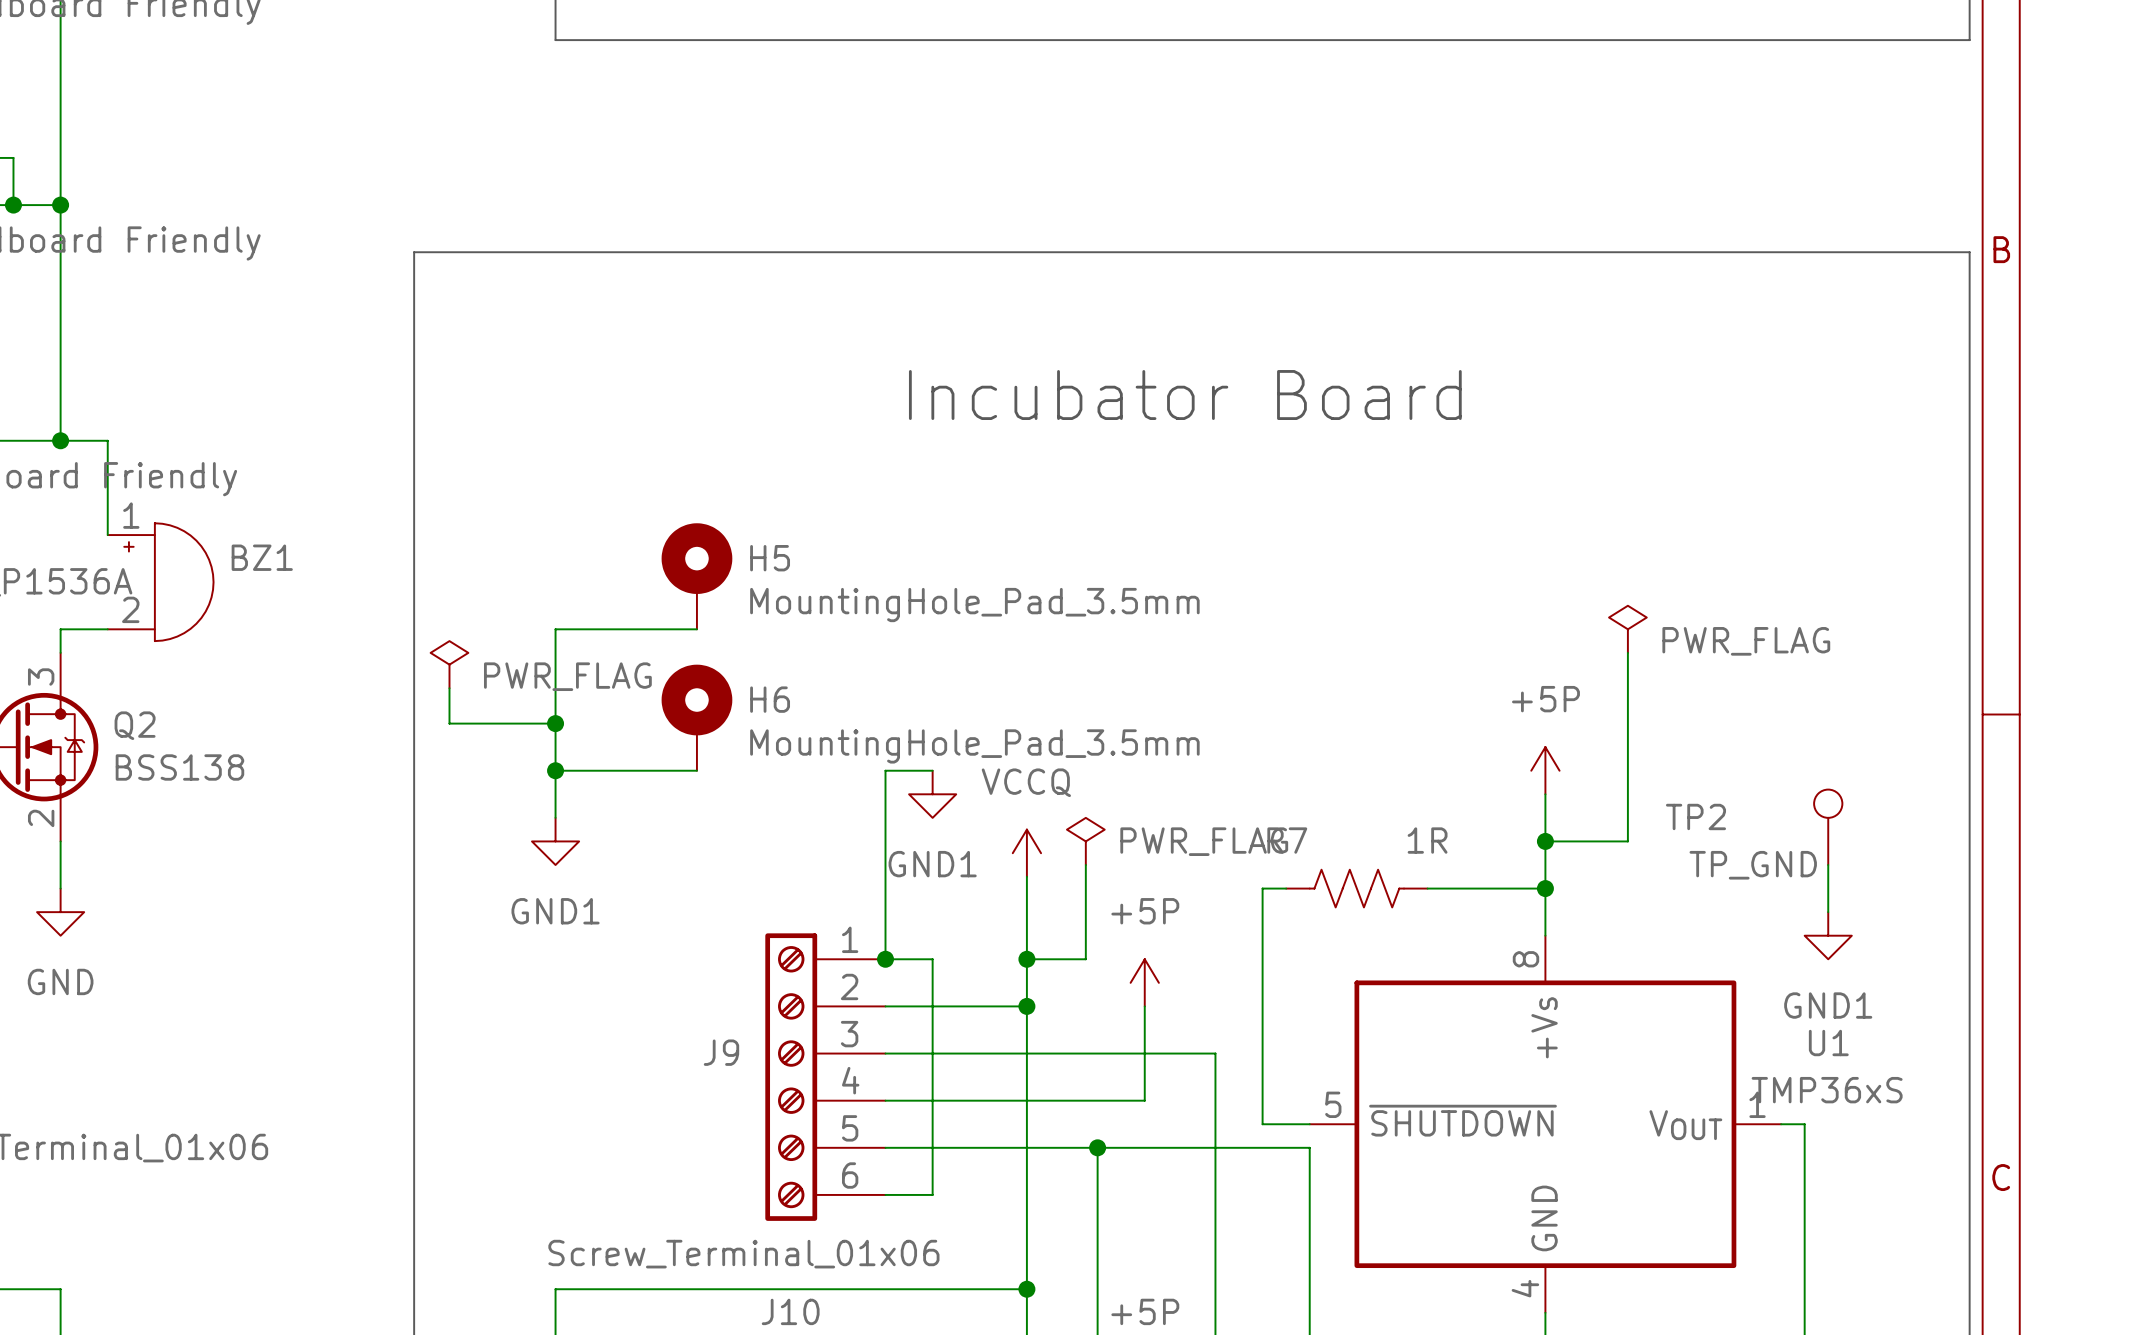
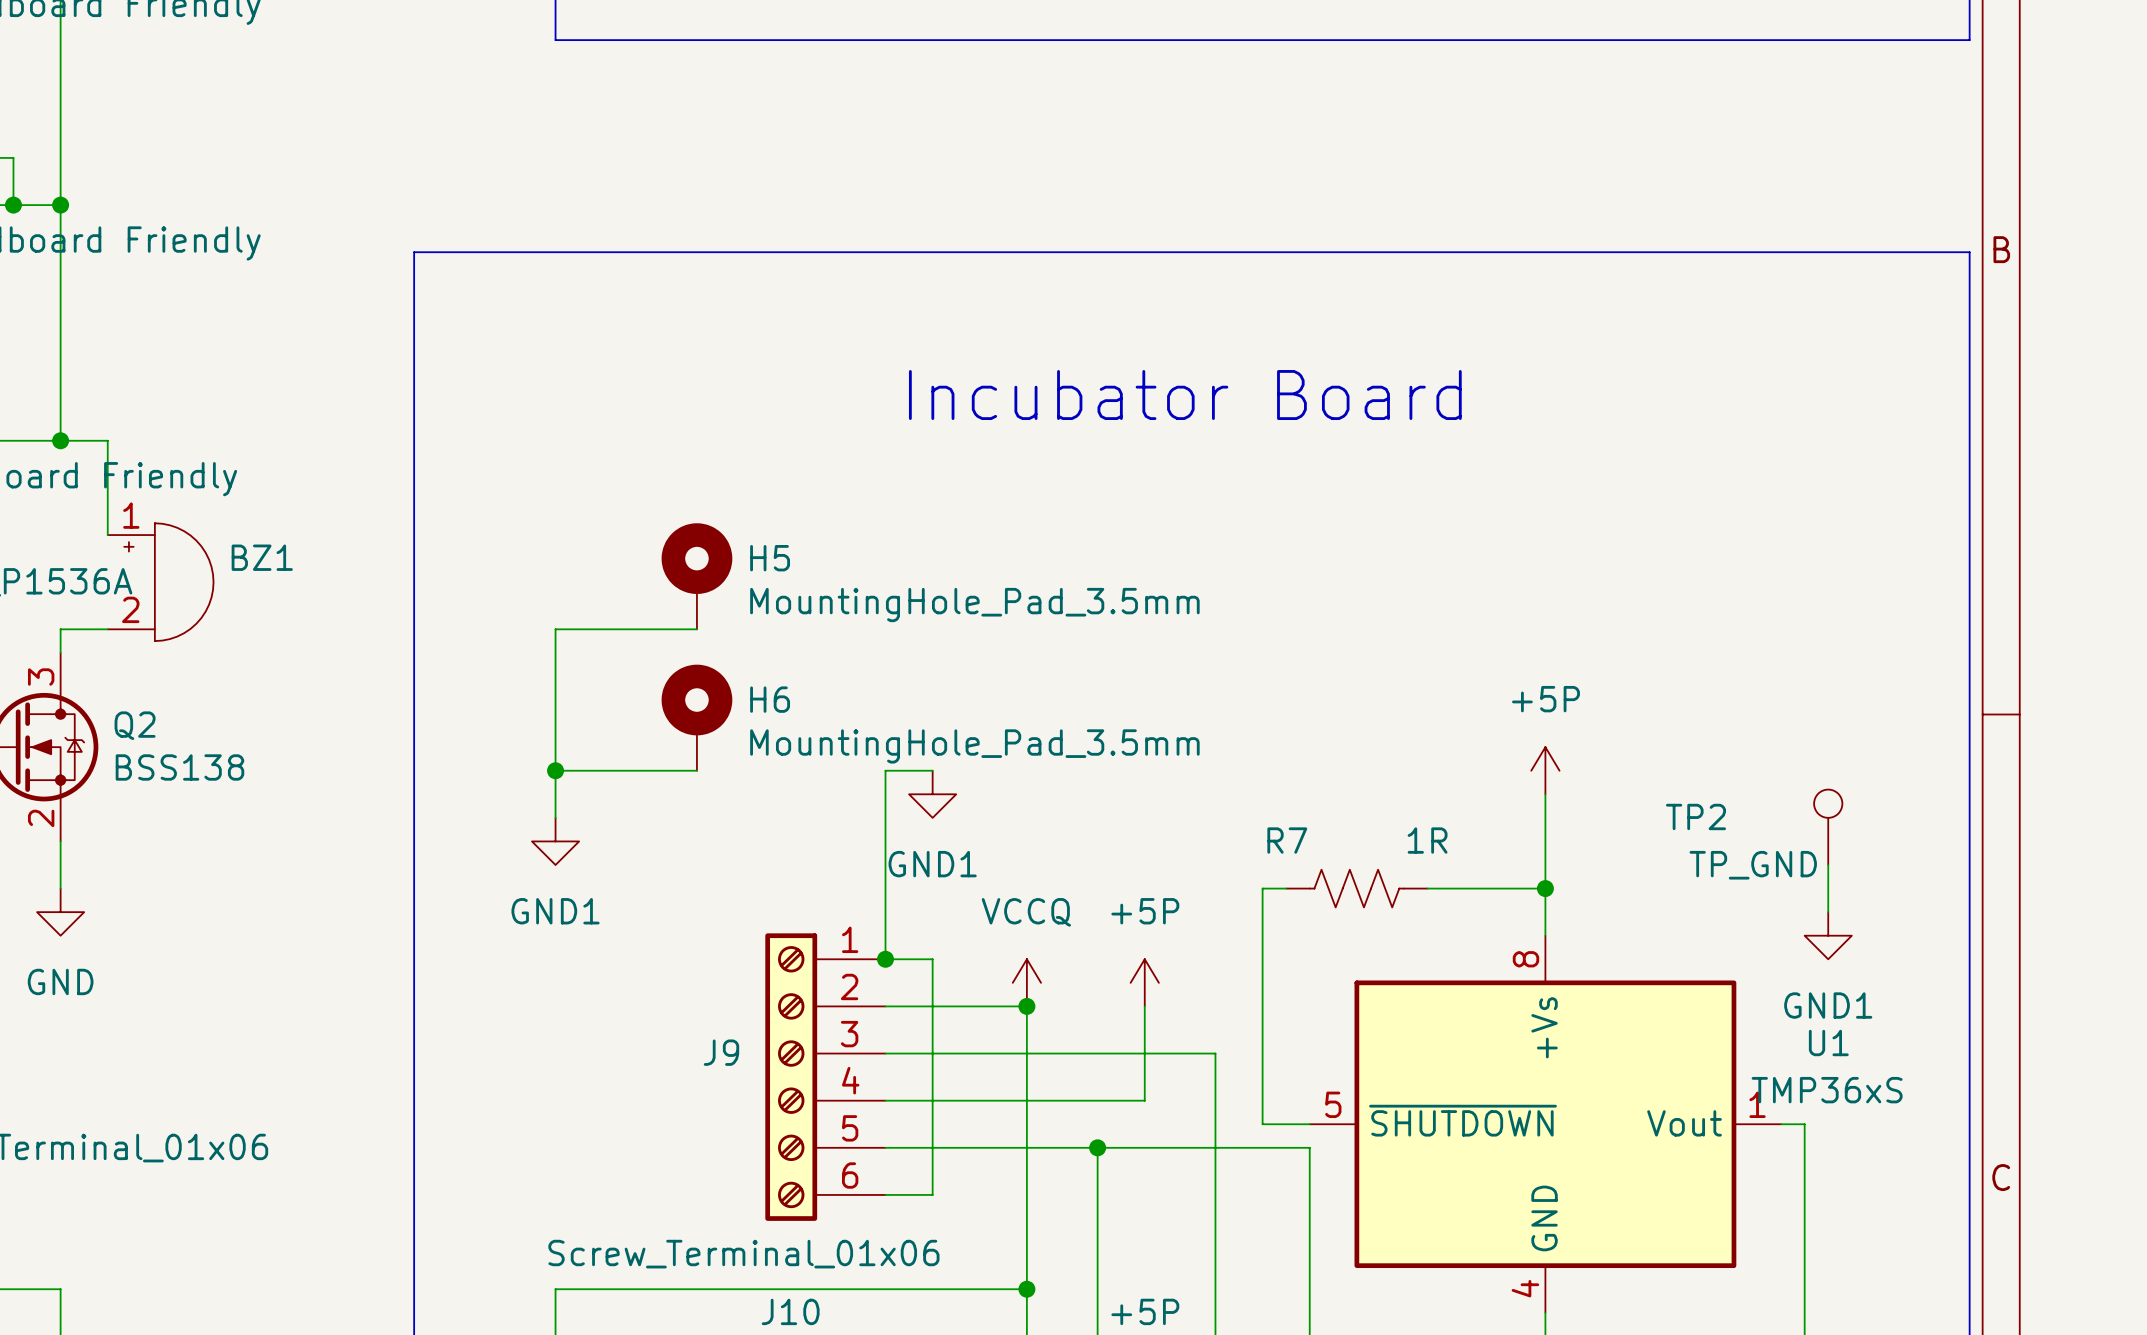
power symbol: PWR_FLAG (1627, 629) -> none
wire: (1627, 652) (1627, 841) (1545, 841) -> none
power symbol: PWR_FLAG (449, 664) -> none
wire: (449, 688) (449, 723) (555, 723) -> none
junction: (555, 723) -> none
power symbol: PWR_FLAG (1085, 841) -> none
junction: (1545, 841) -> none
power symbol position: VCCQ (1026, 853) -> VCCQ (1026, 982)
wire: (1085, 865) (1085, 959) (1026, 959) -> none
wire: (1026, 876) (1026, 1006) -> none
junction: (1026, 959) -> none
U1 pin name: VOUT (1685, 1125) -> Vout (1684, 1123)

